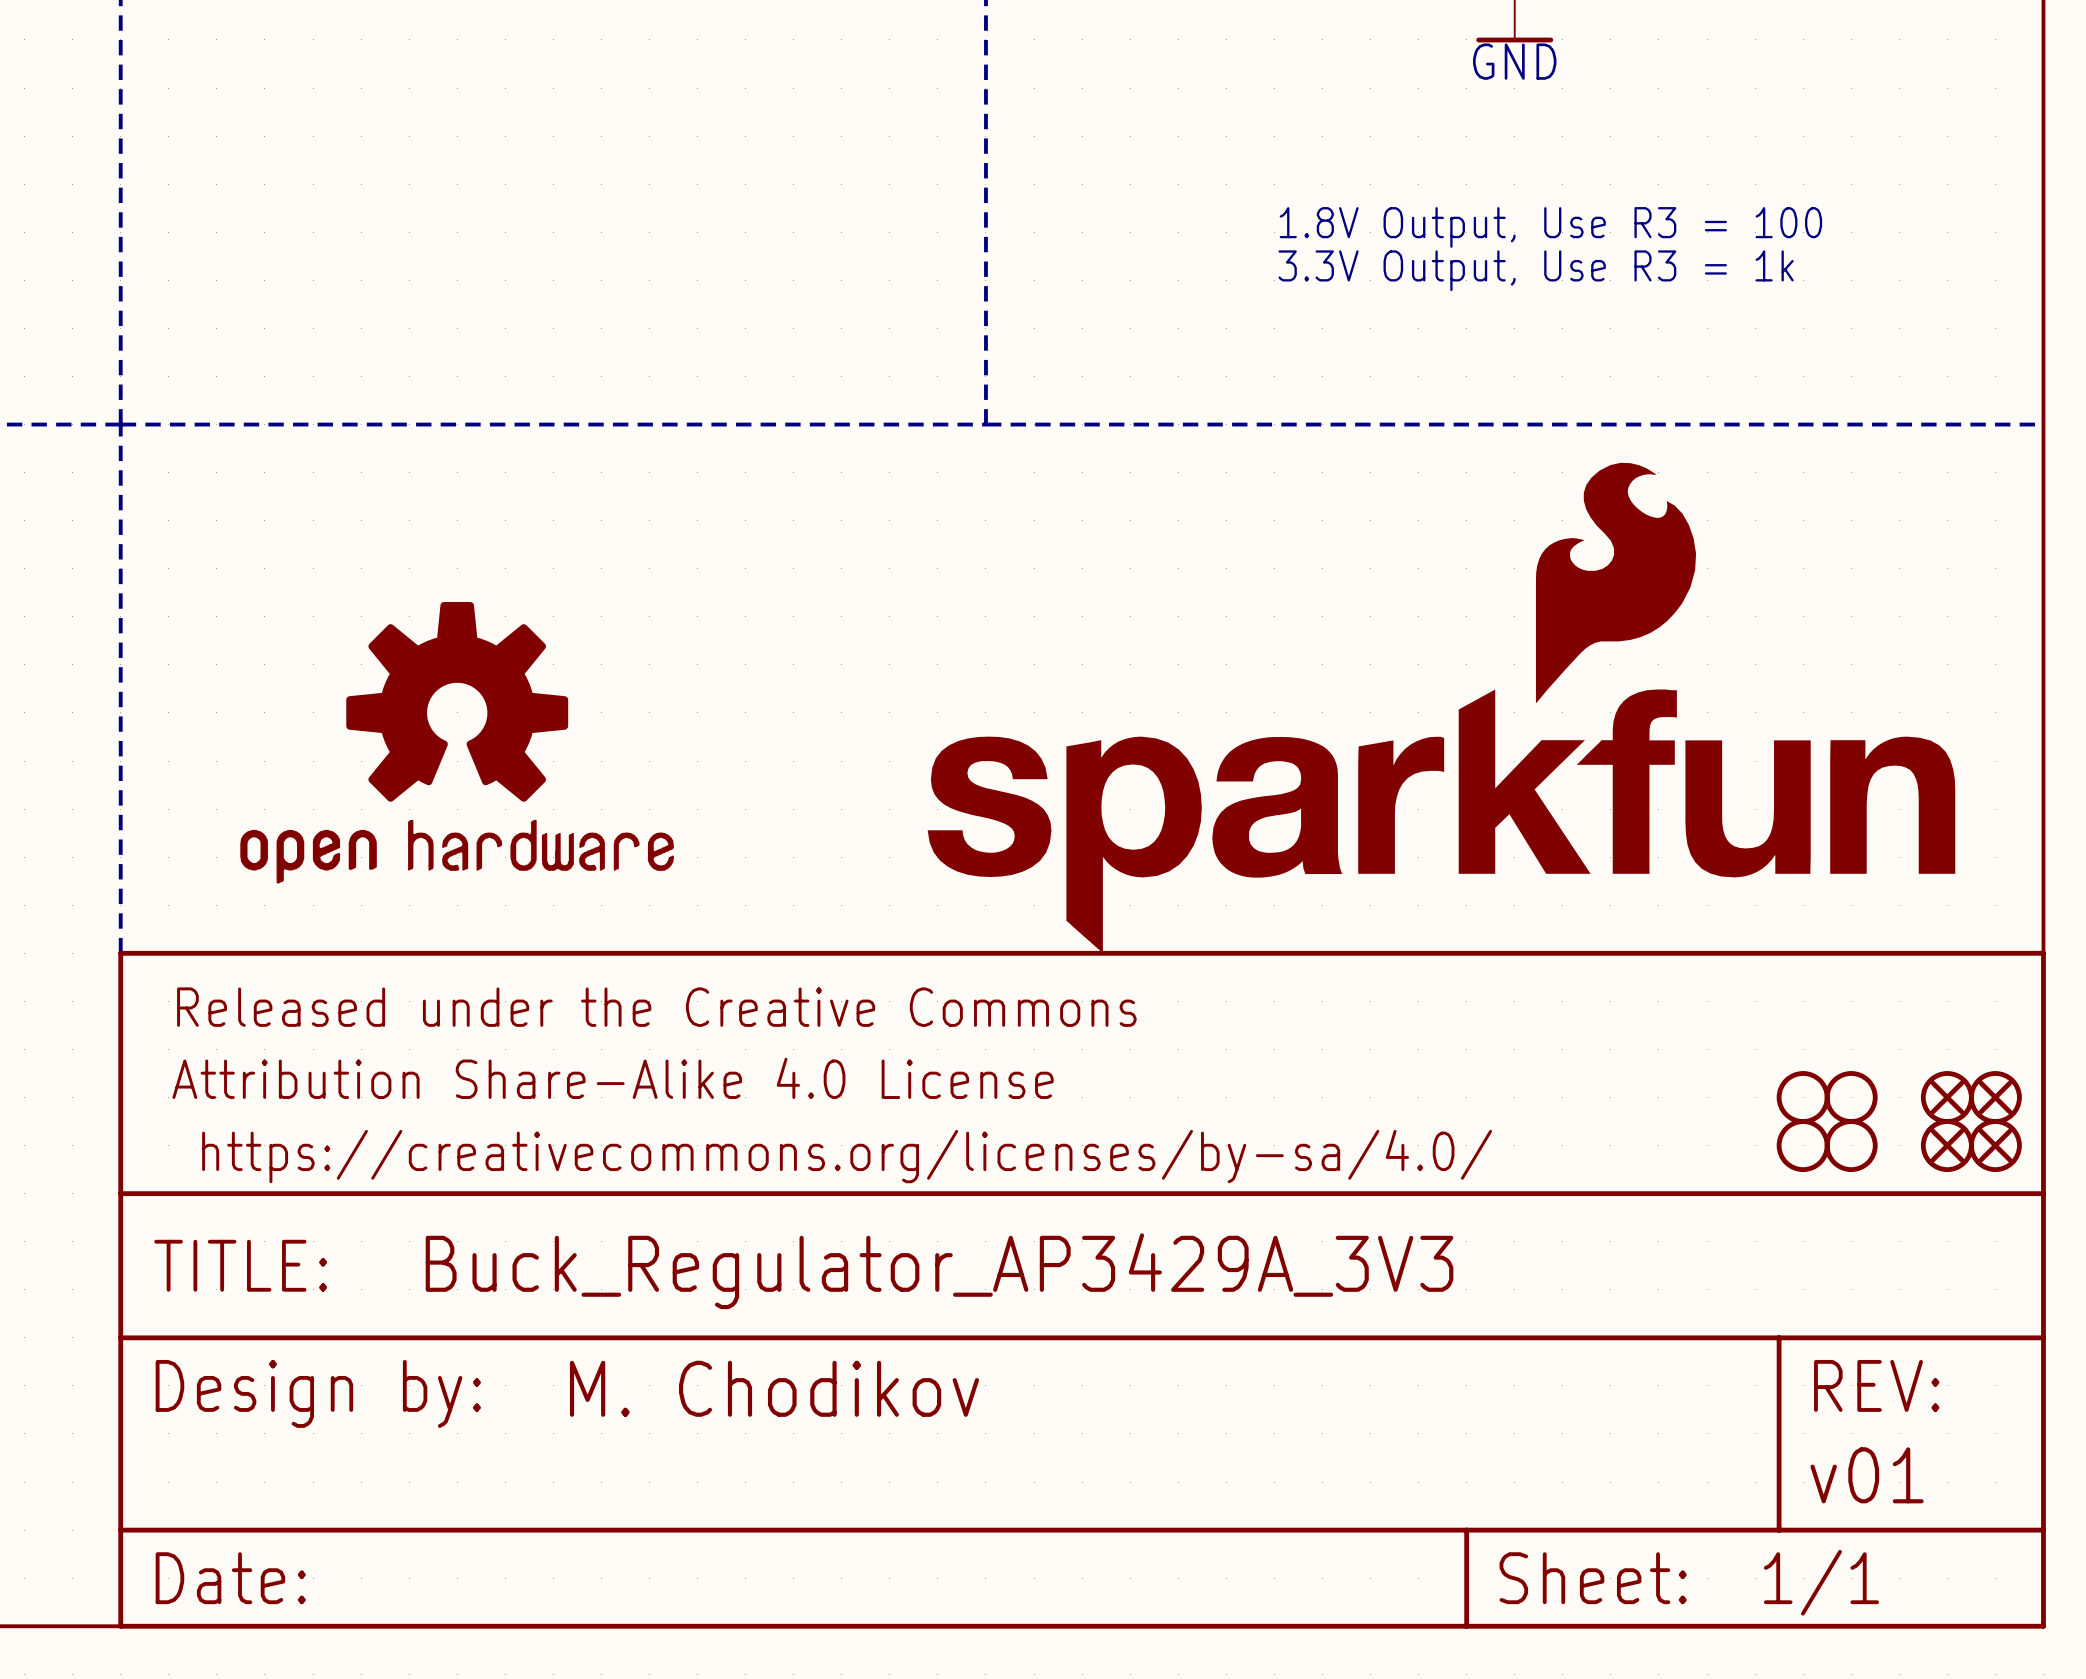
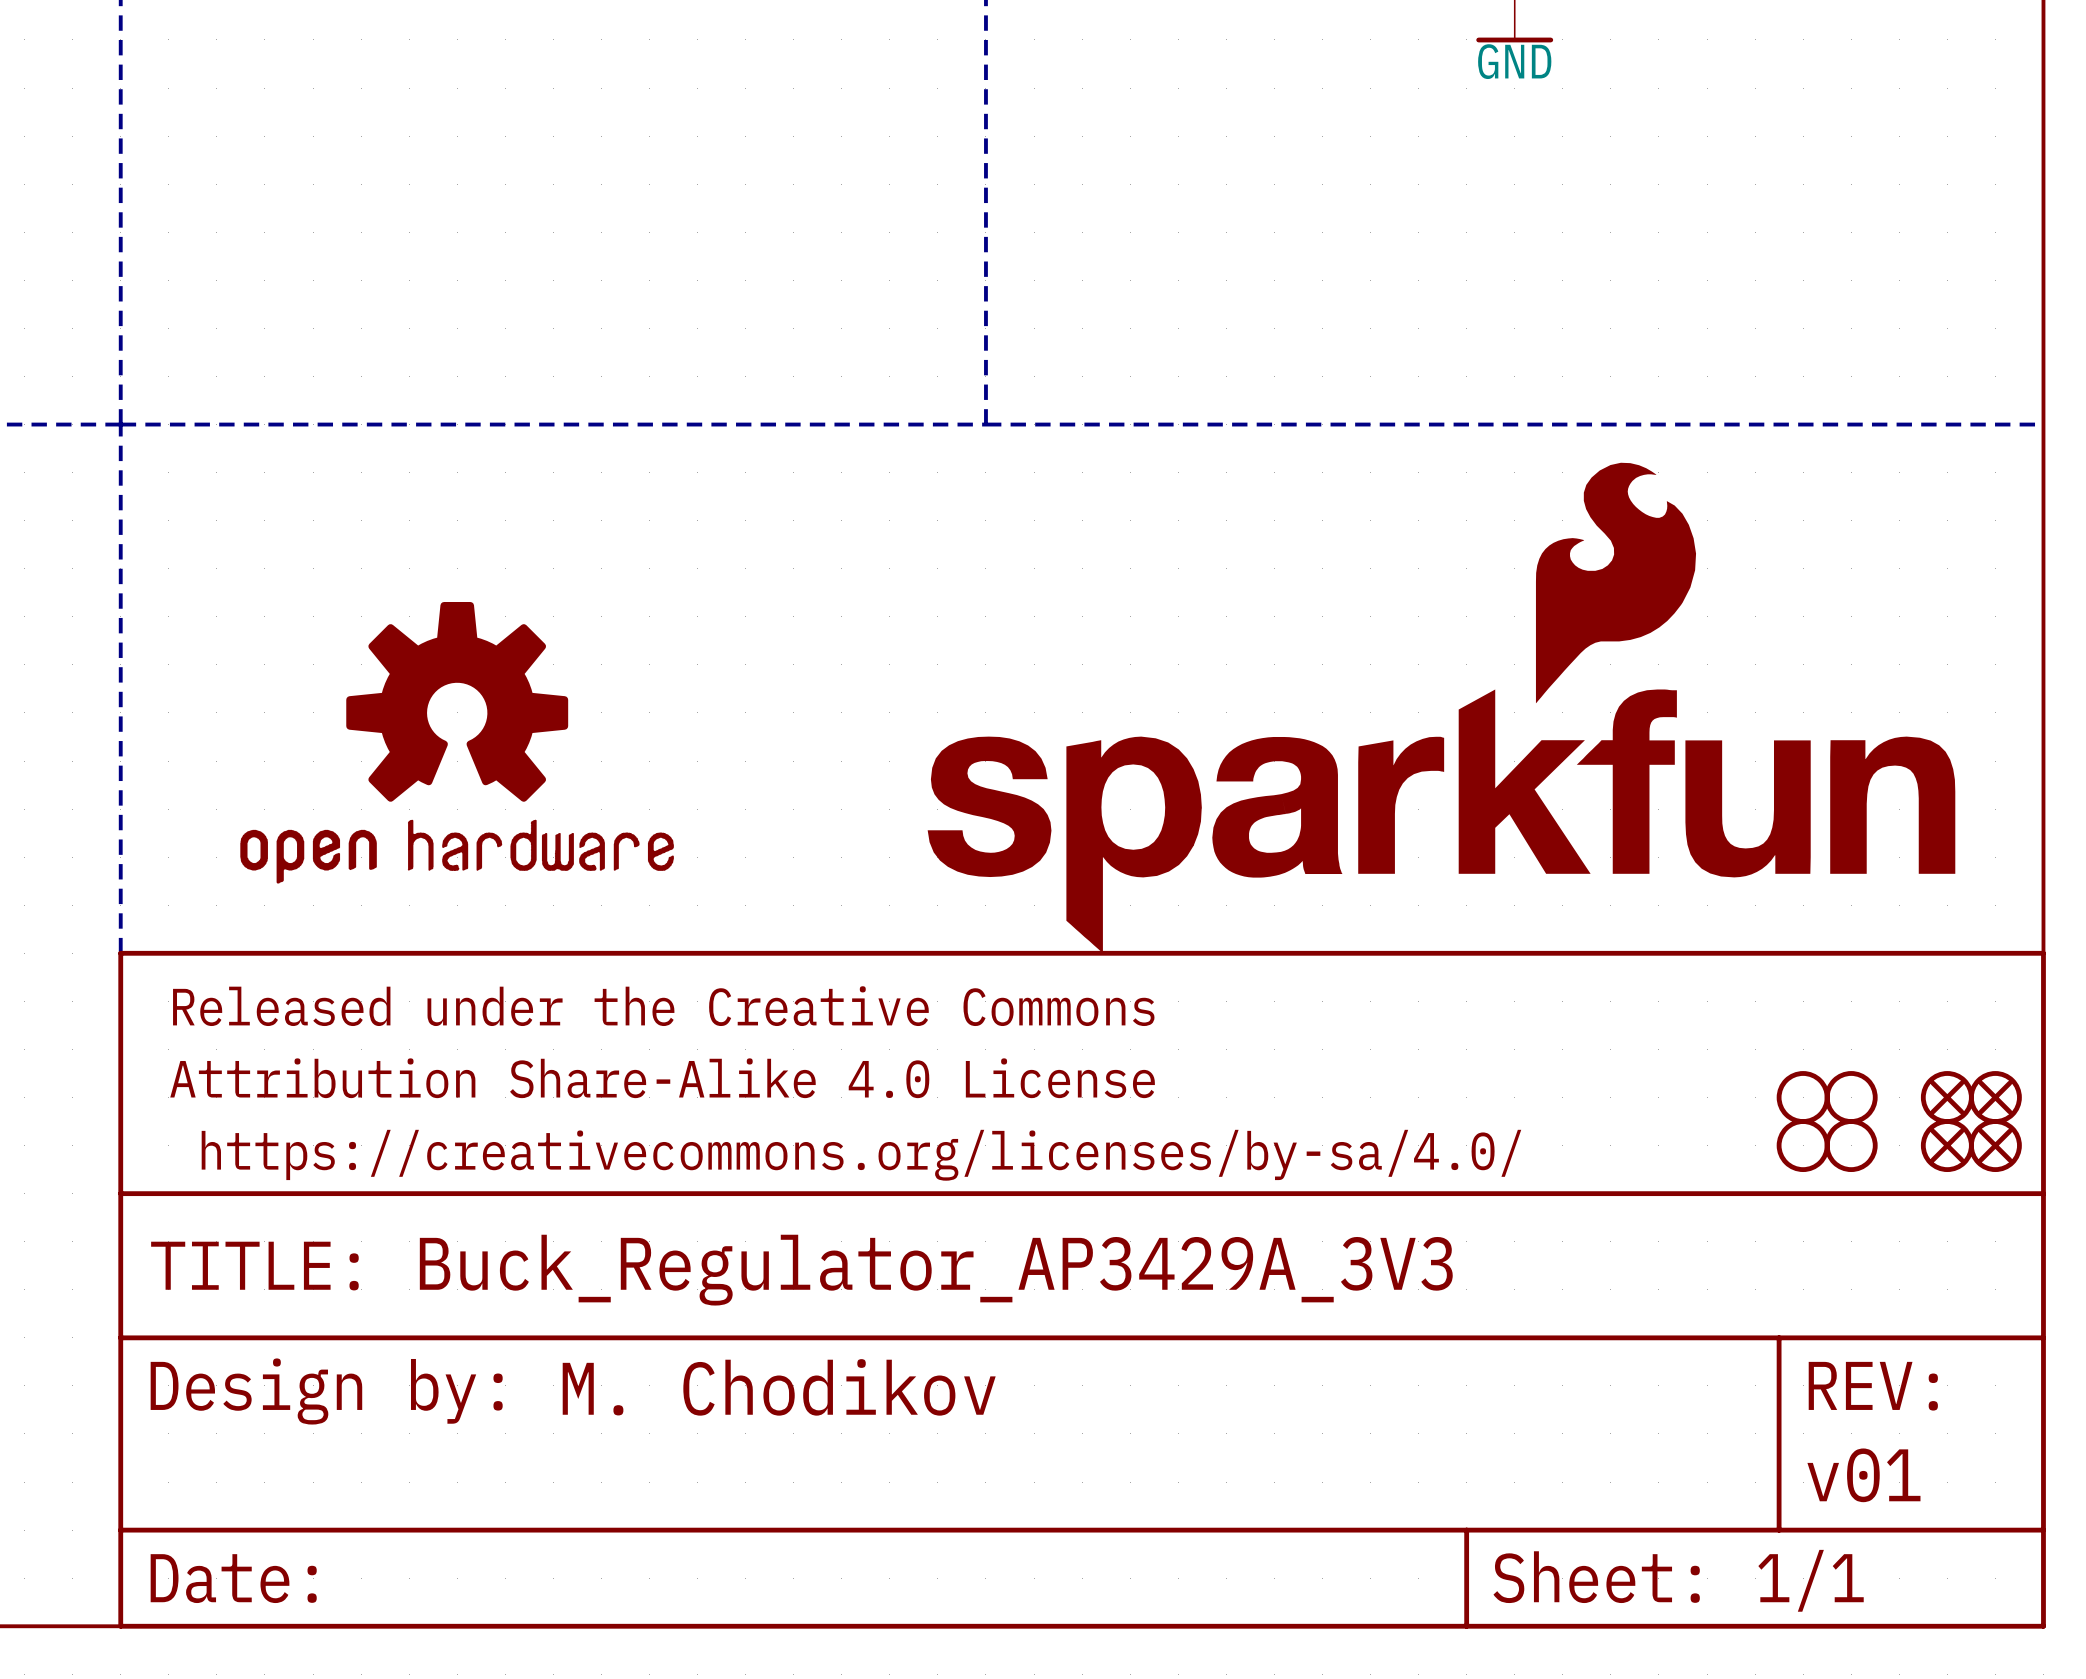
text: 1.8V Output, Use R3 = 100 (1550, 227) -> none
text: 3.3V Output, Use R3 = 1k (1536, 270) -> none

